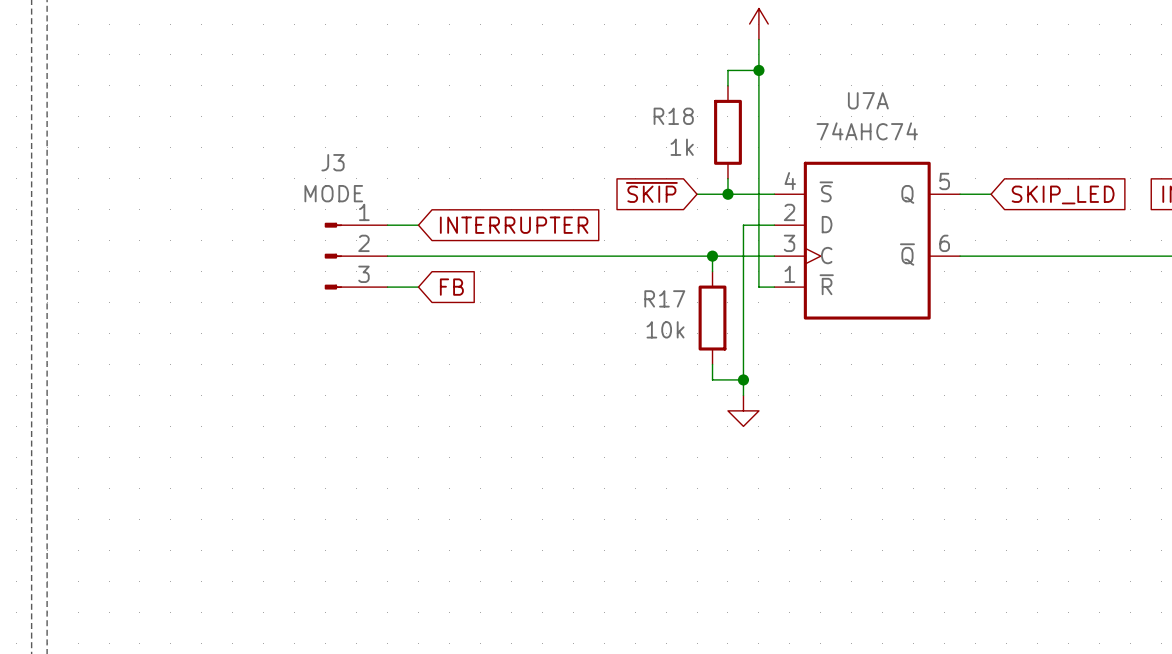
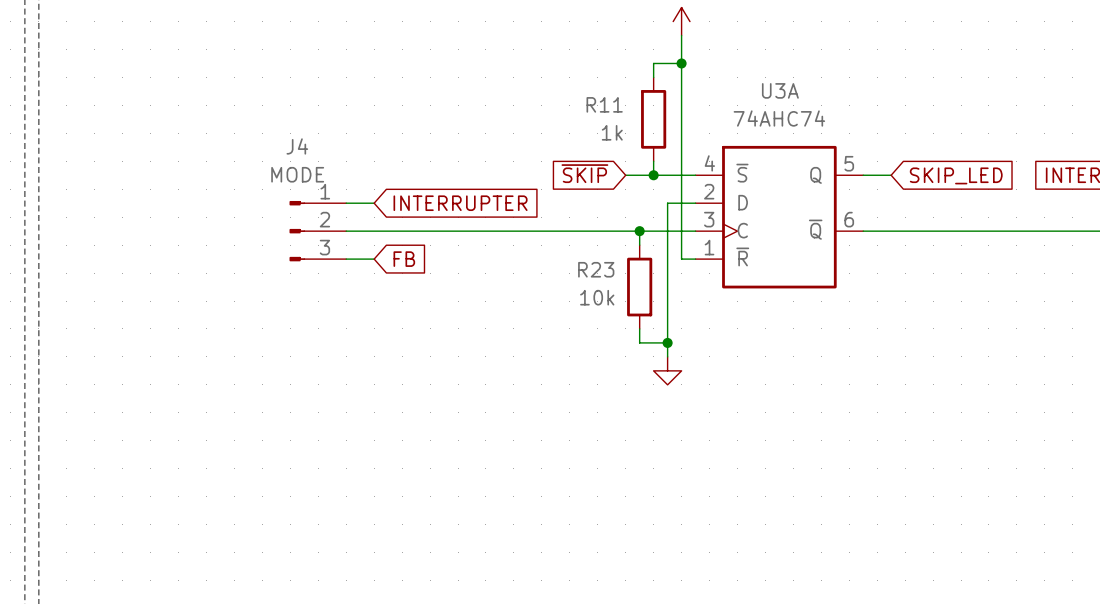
U7A name: U7A (868, 100) -> U3A (780, 90)
R18 name: R18 (673, 116) -> R11 (604, 104)
J3 name: J3 (333, 162) -> J4 (297, 146)
R17 name: R17 (664, 298) -> R23 (596, 269)

